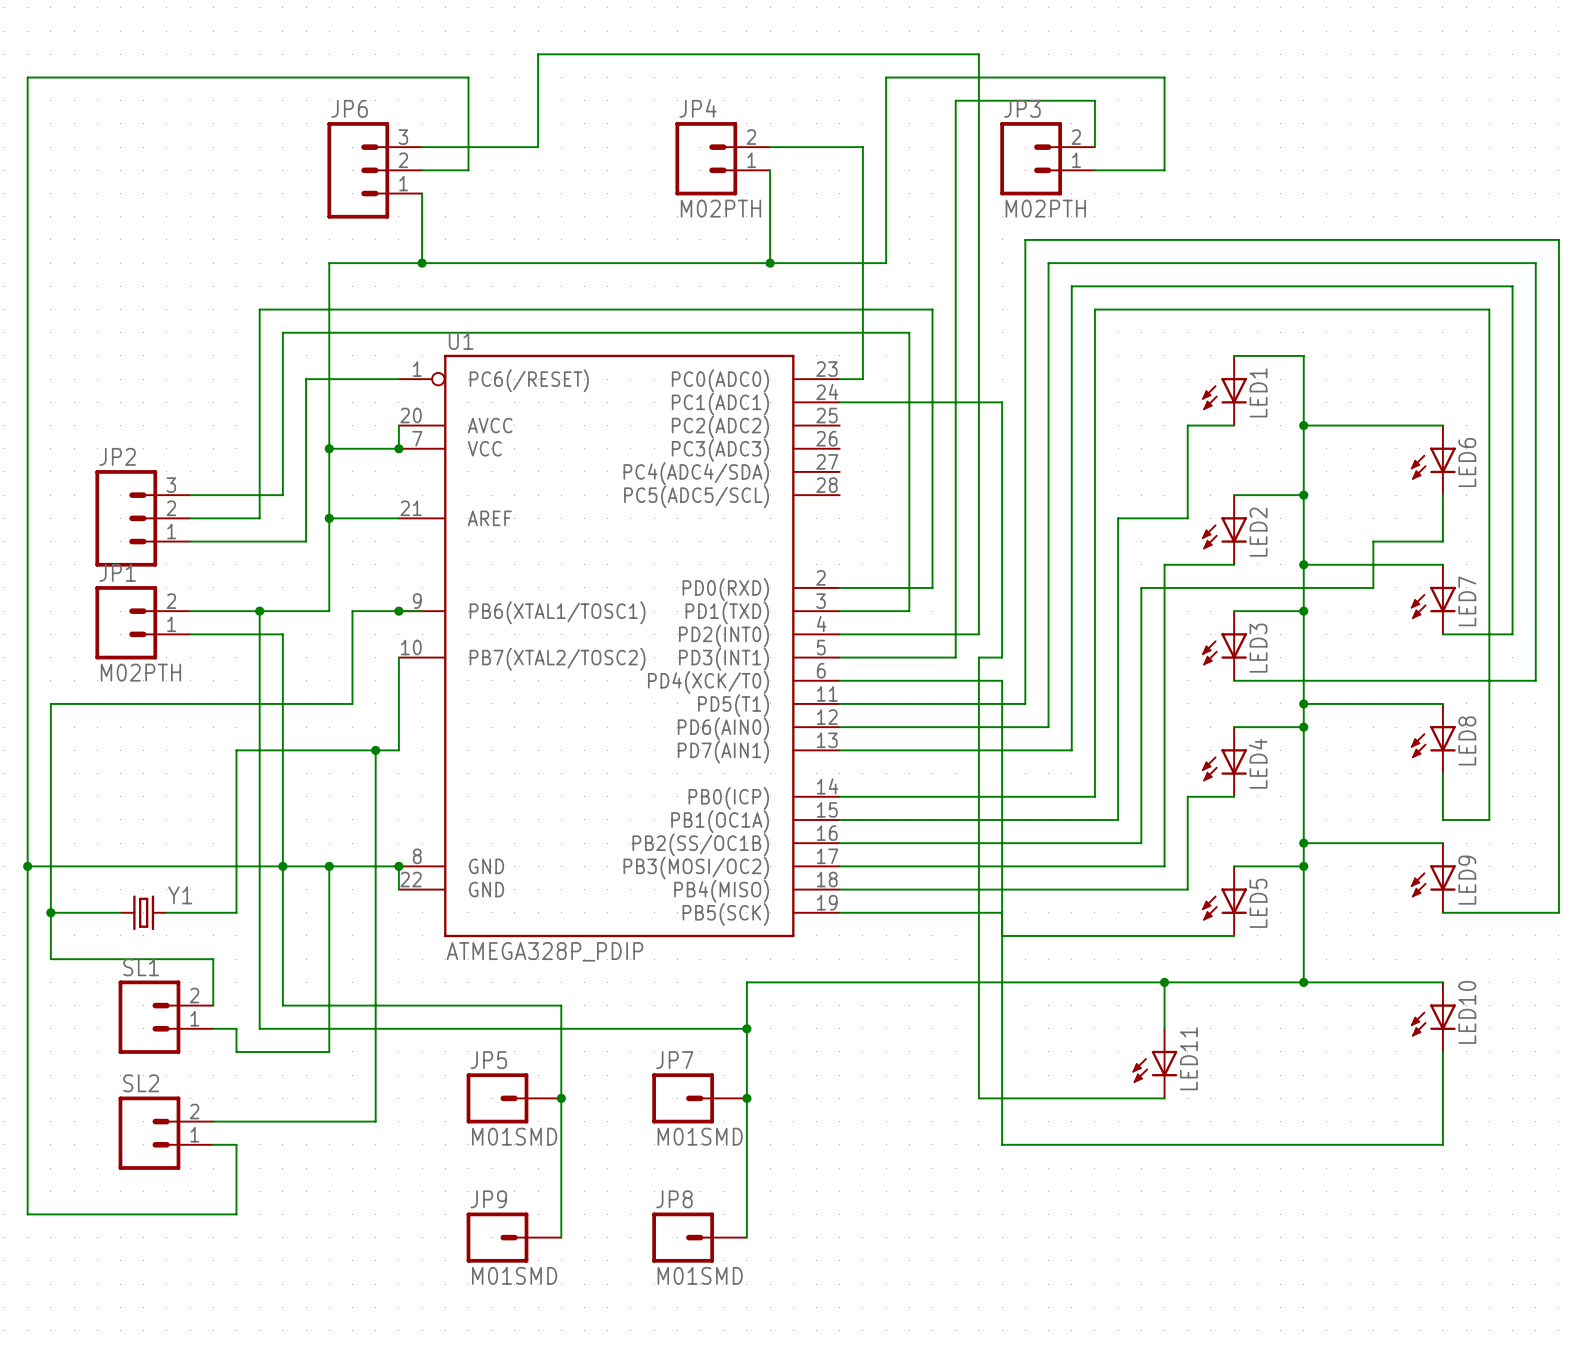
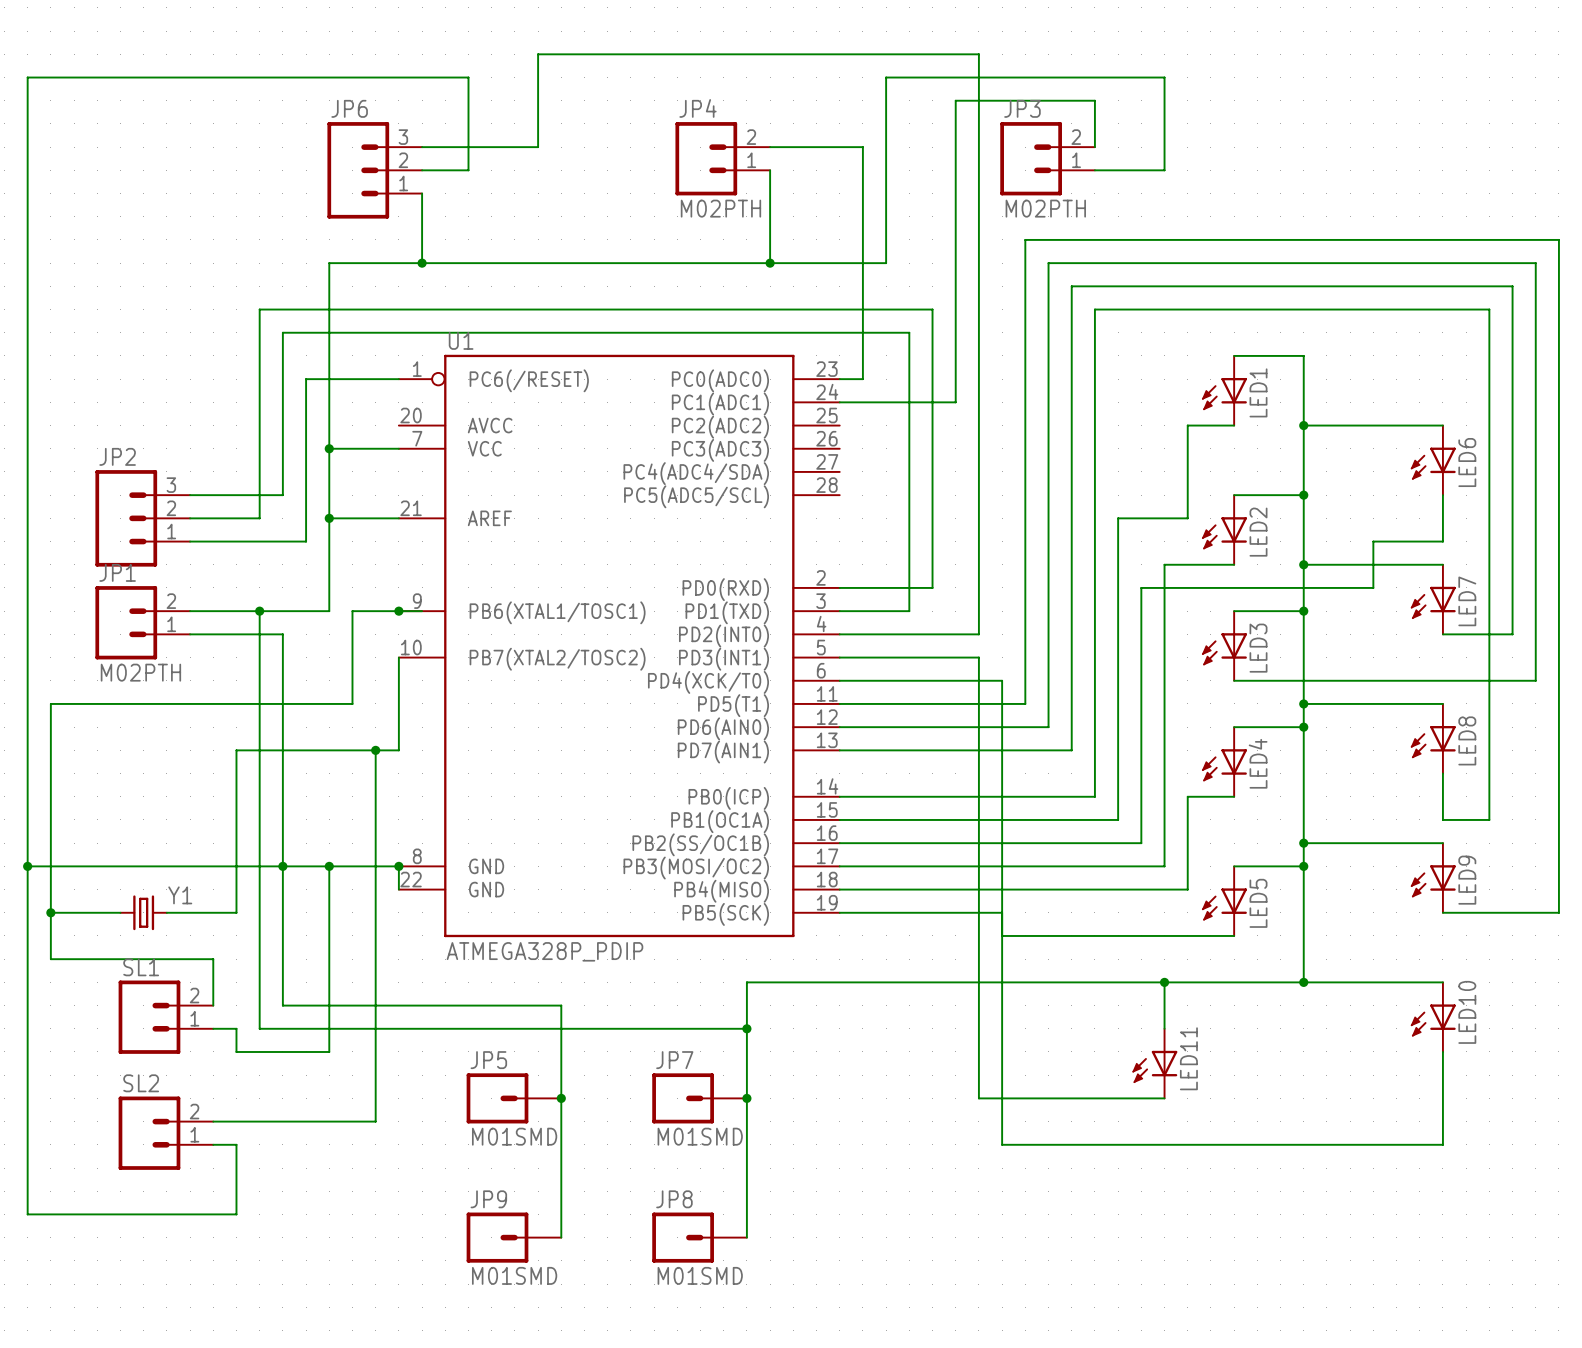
wire: (398, 425) (398, 448) -> none
junction: (398, 448) -> none
wire: (955, 657) (955, 402) (1002, 402) (1002, 657) (978, 657) -> (955, 657) (978, 657)

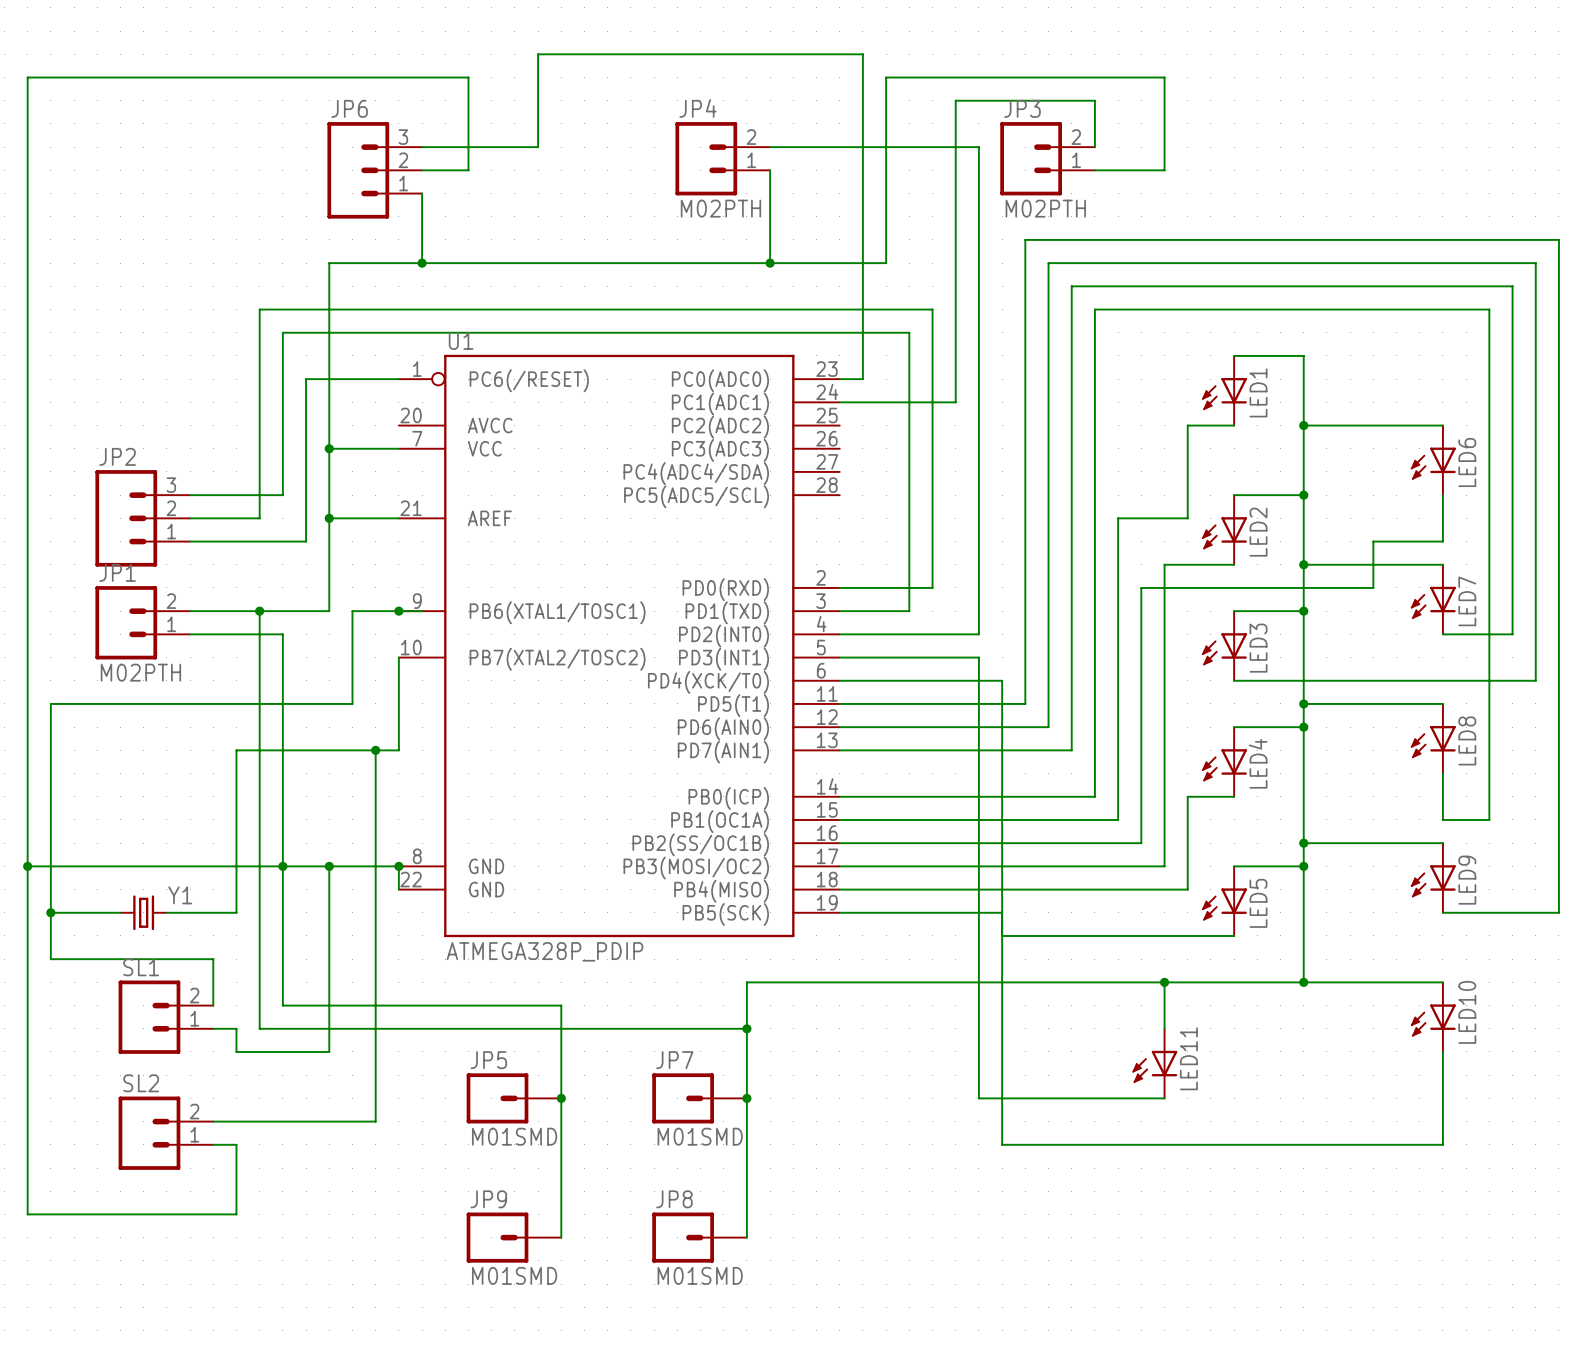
wire: (862, 54) (978, 54) (978, 147) -> (862, 54) (862, 147) (978, 147)

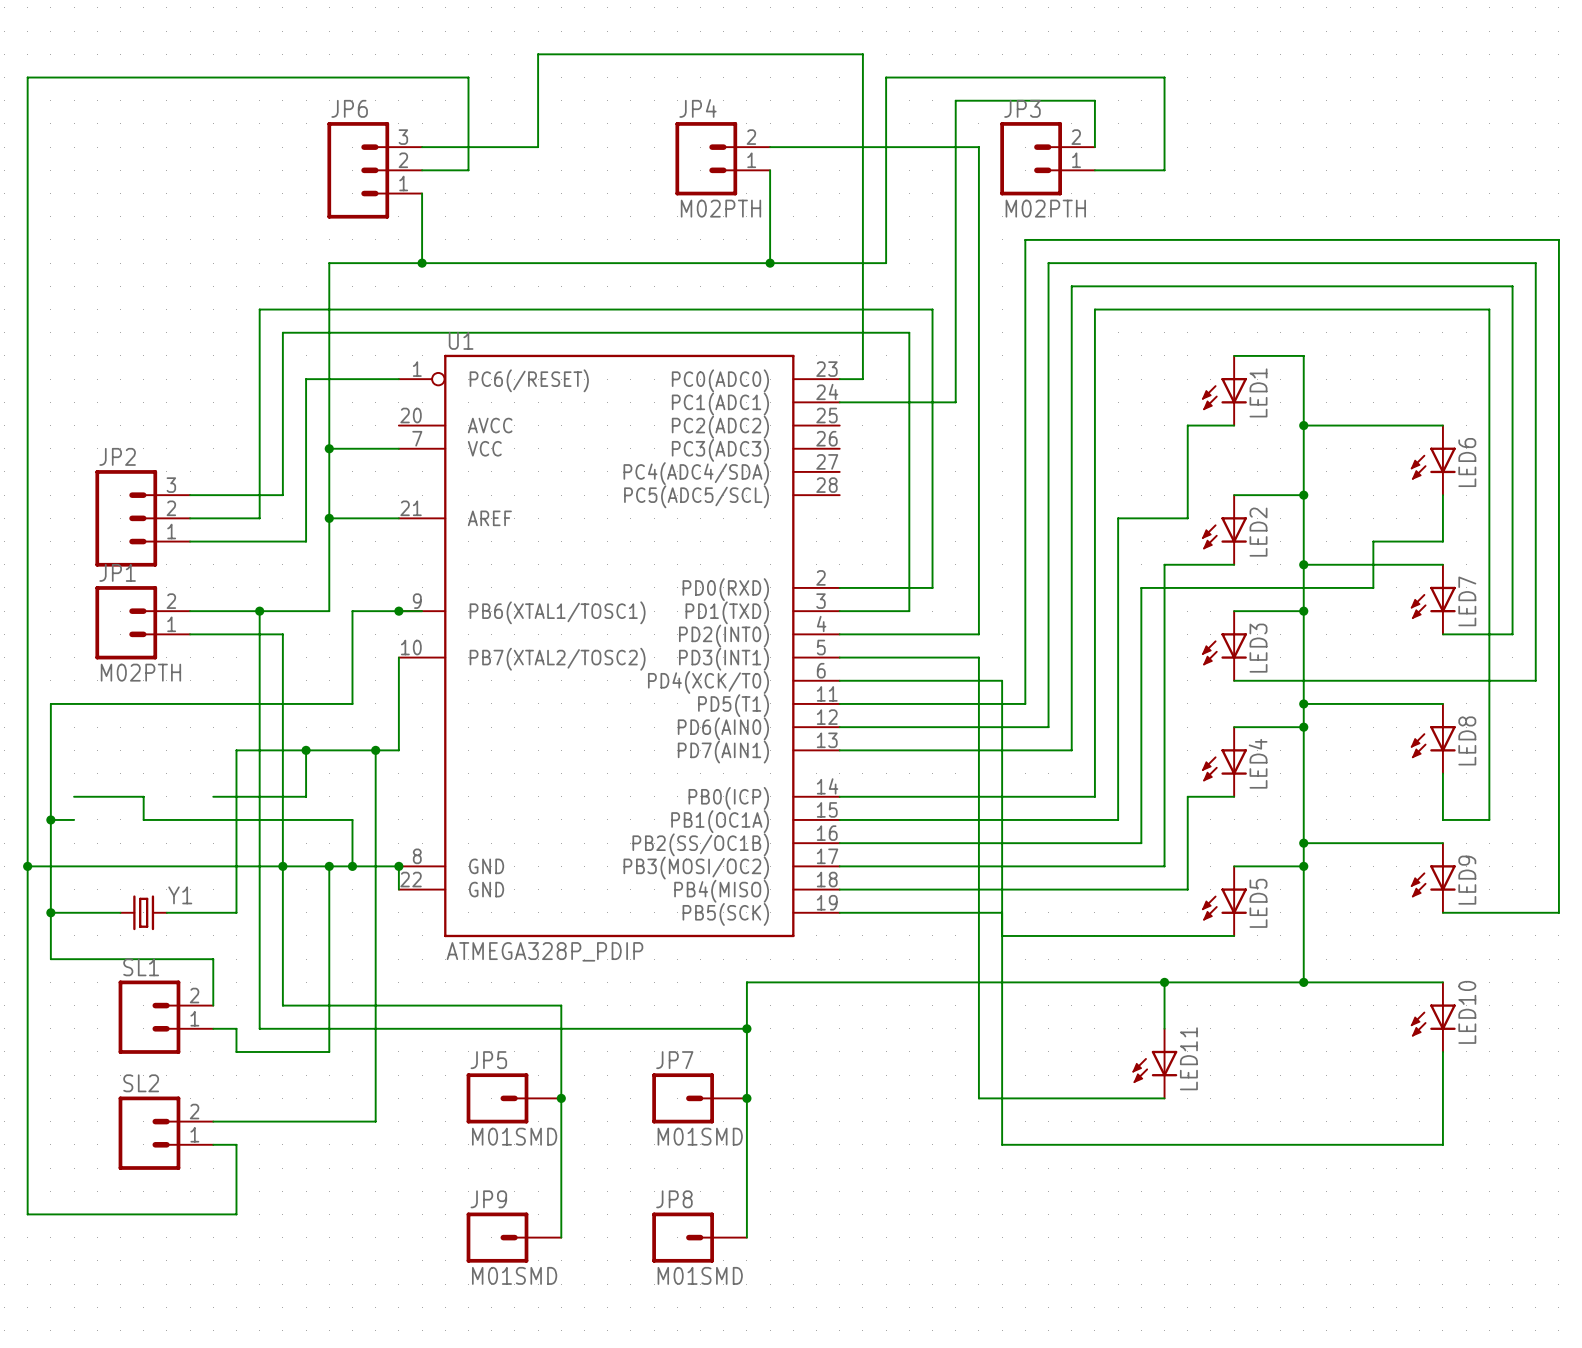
wire: none -> (306, 750) (306, 796) (213, 796)
junction: none -> (306, 750)
wire: none -> (74, 796) (143, 796) (143, 819) (352, 819) (352, 866)
wire: none -> (50, 819) (74, 819)
junction: none -> (50, 819)
junction: none -> (352, 866)

